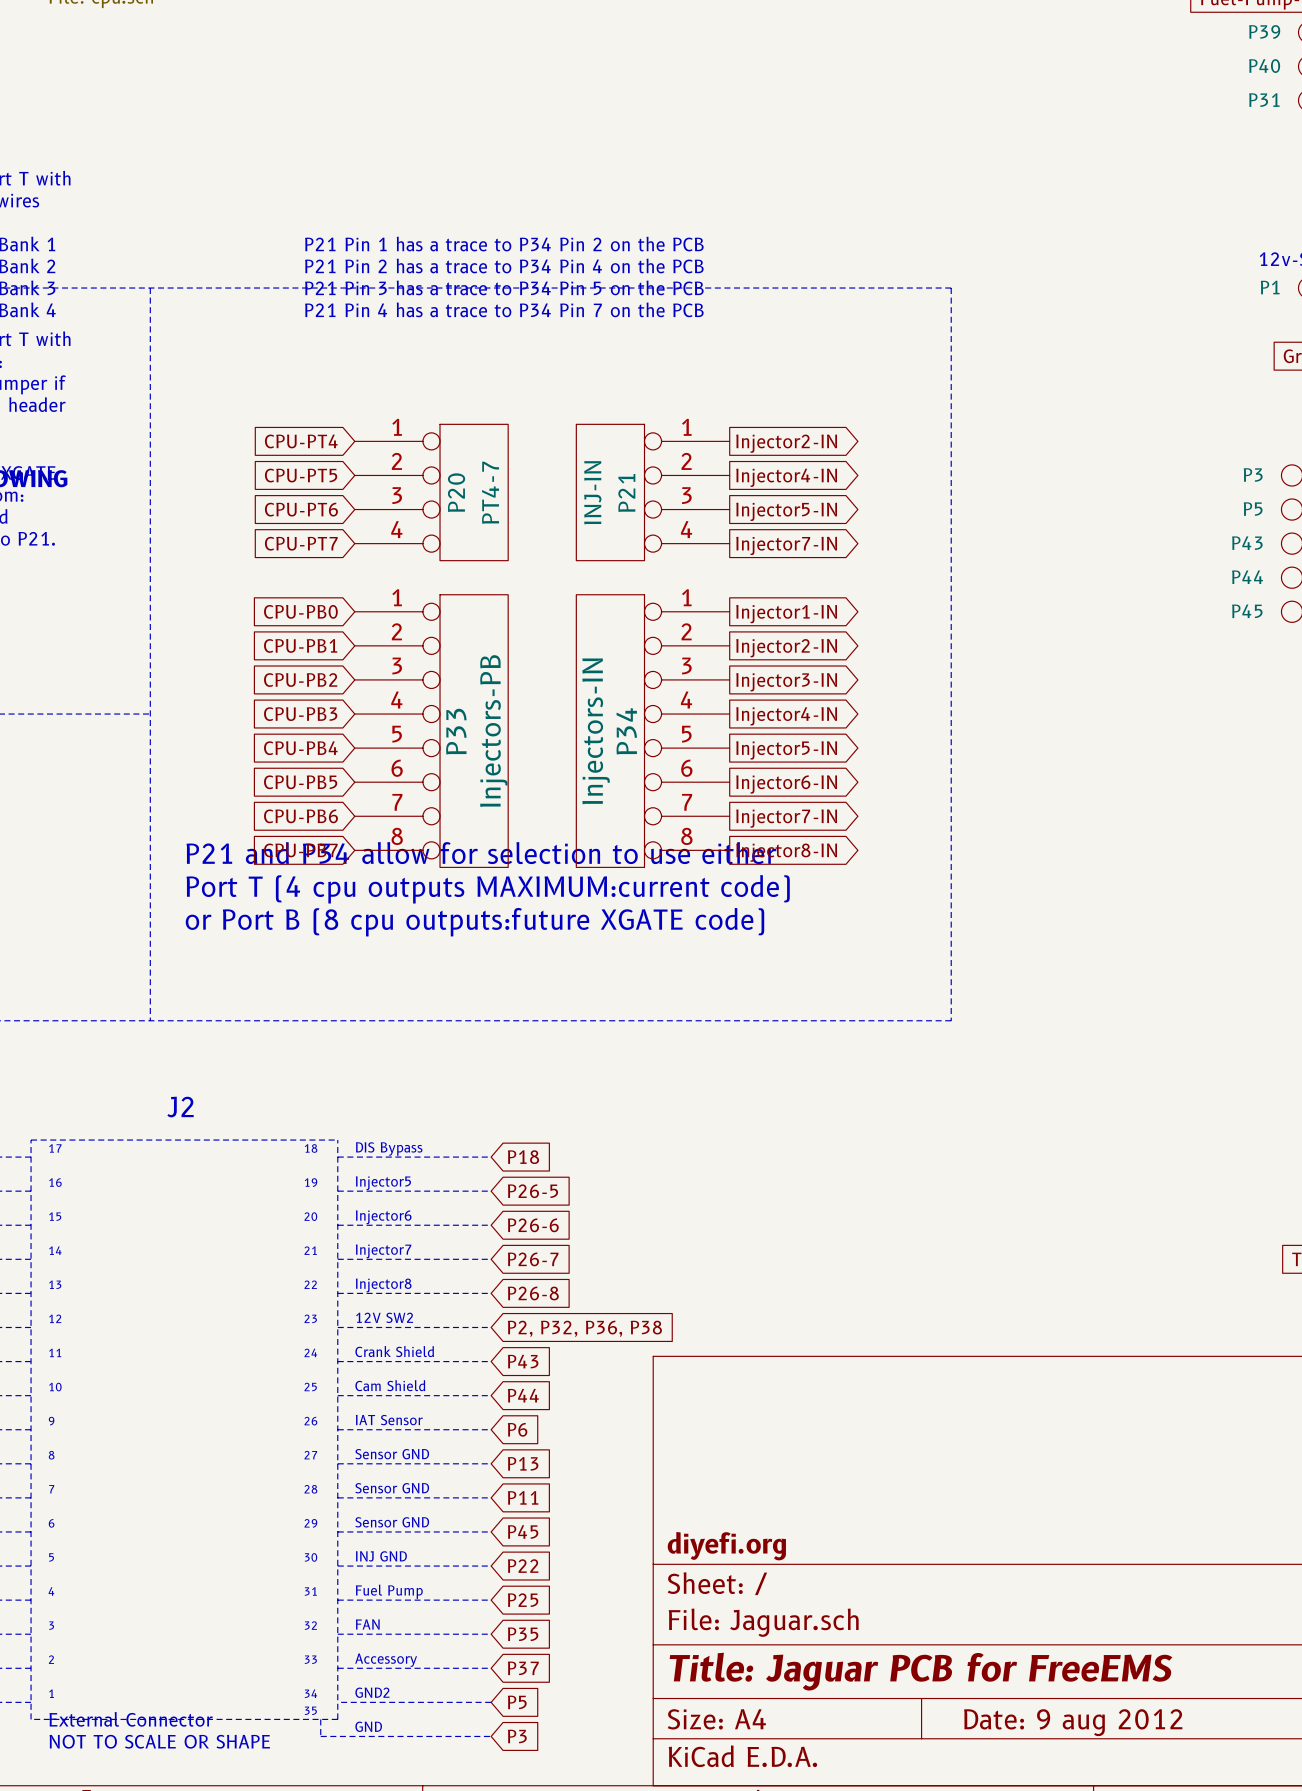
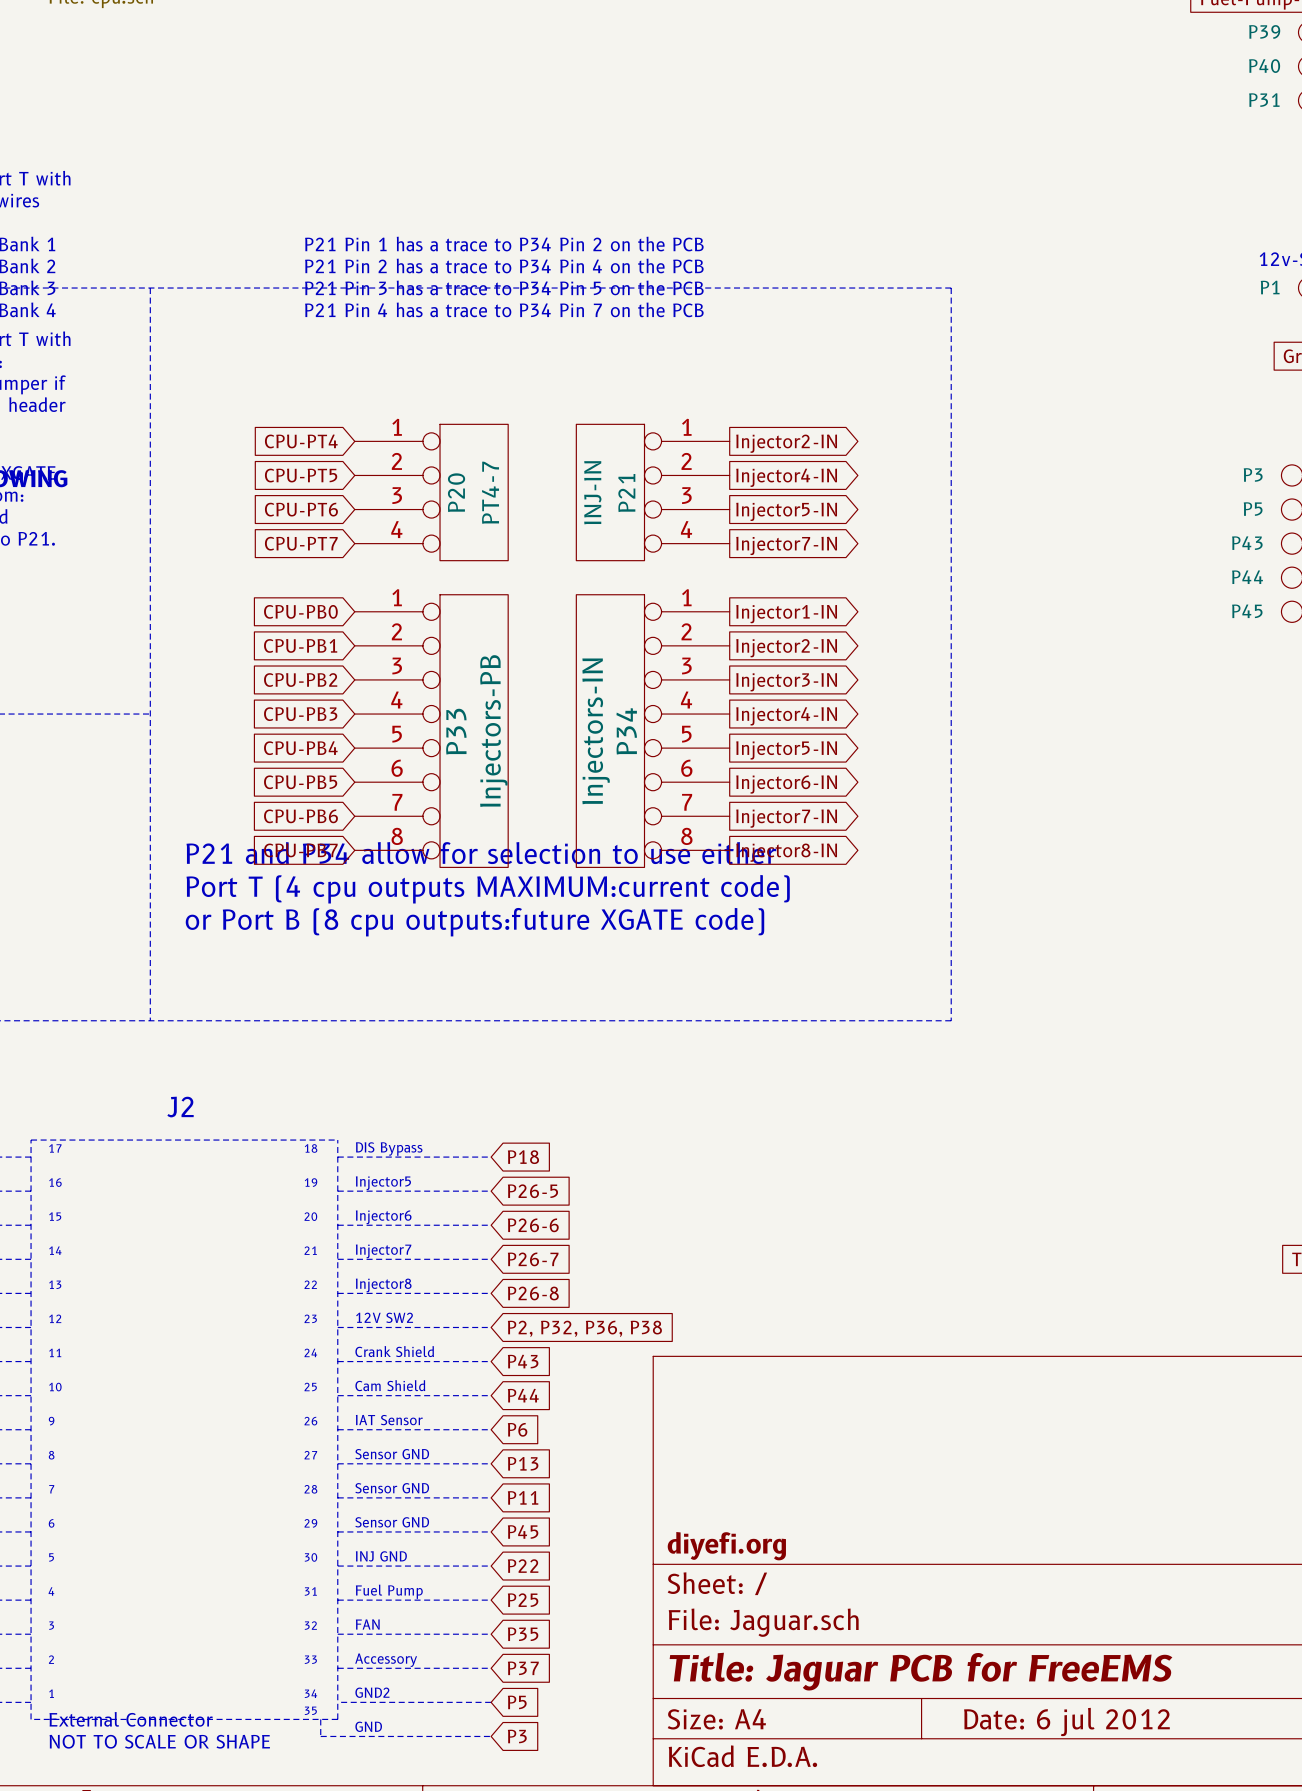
title block: Date: 9 aug 2012 (1073, 1722) -> Date: 6 jul 2012 (1066, 1721)

